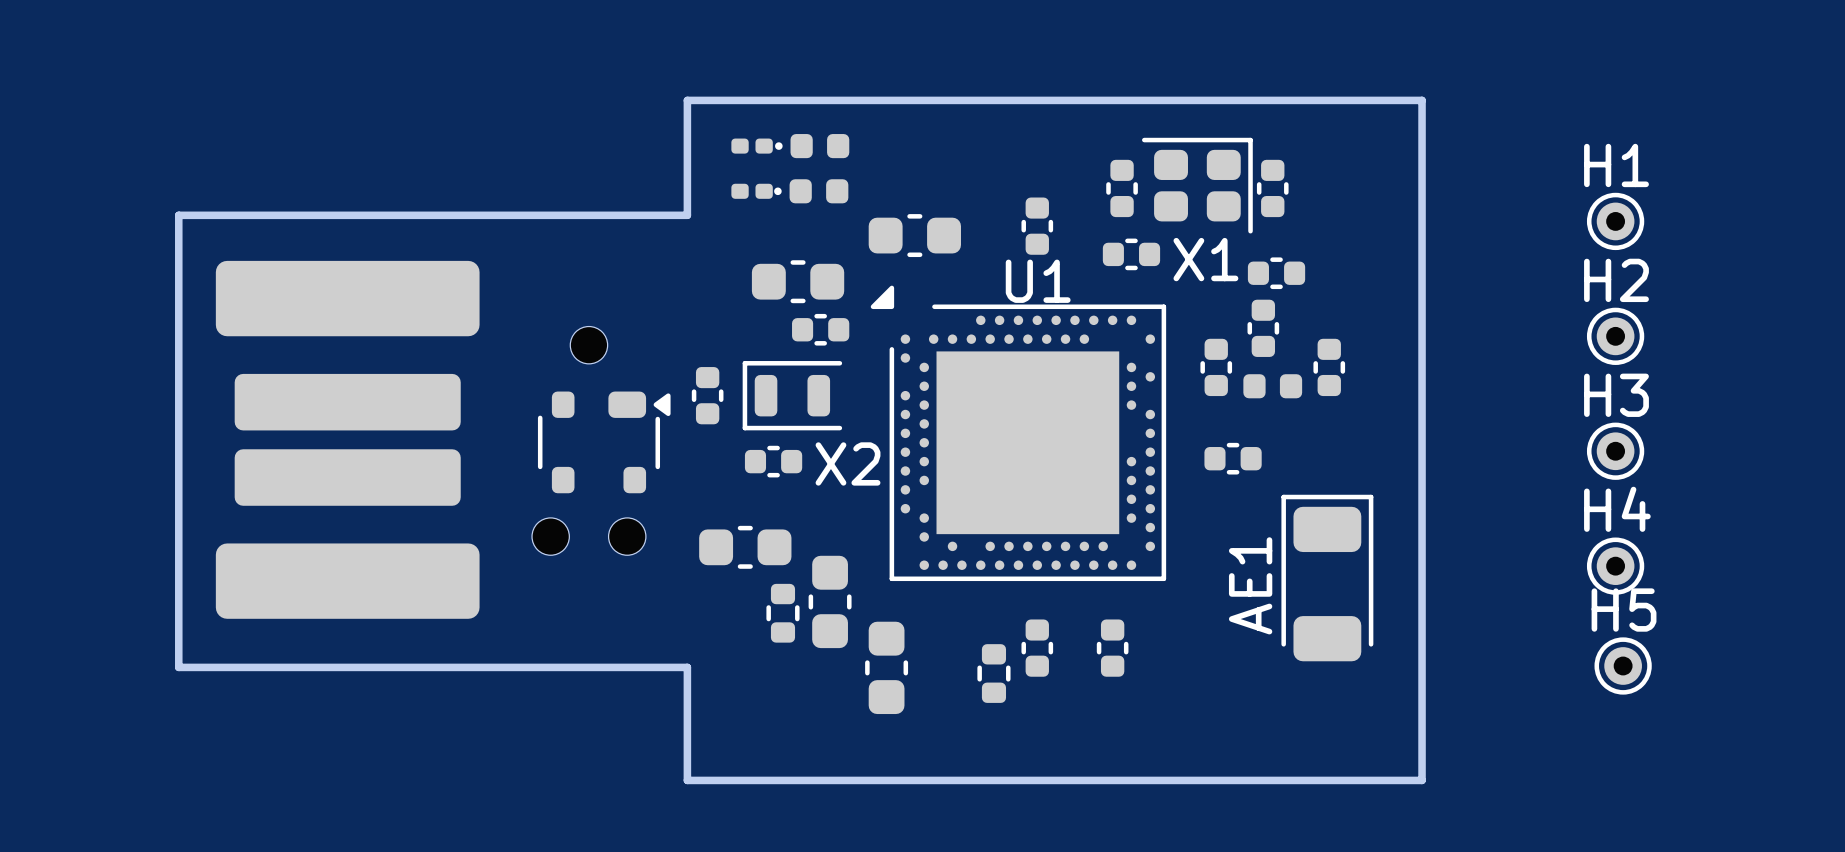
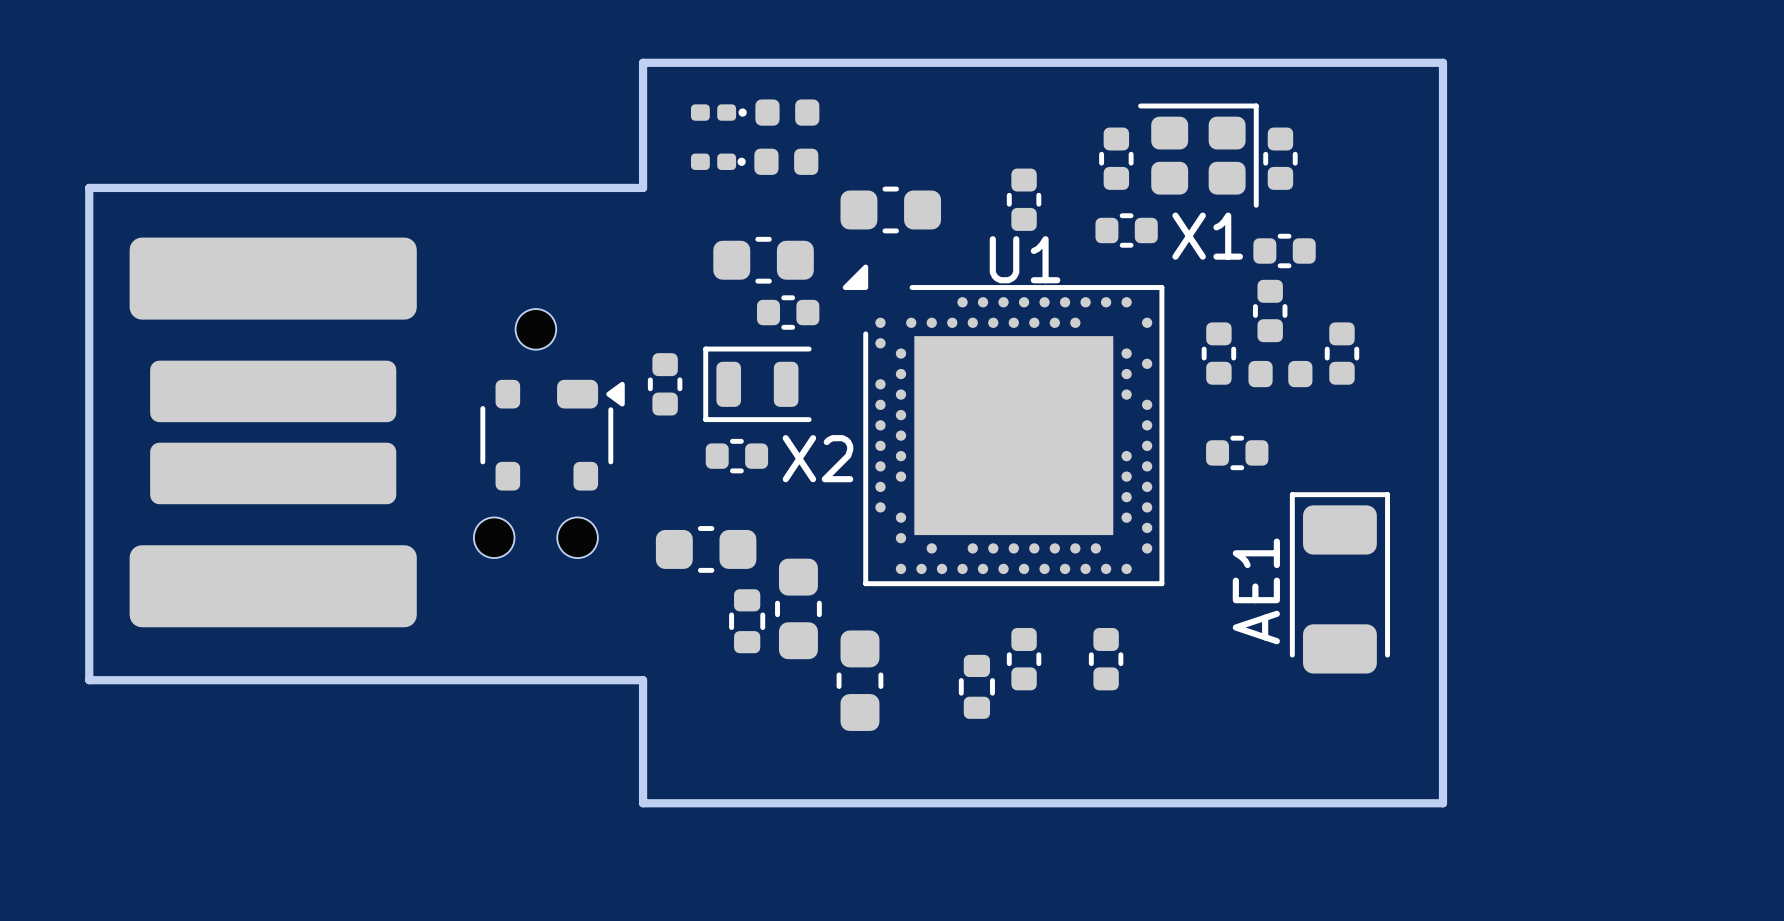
H1: (1615, 221) -> none
H2: (1615, 336) -> none
H3: (1615, 451) -> none
H4: (1615, 566) -> none
H5: (1623, 665) -> none

